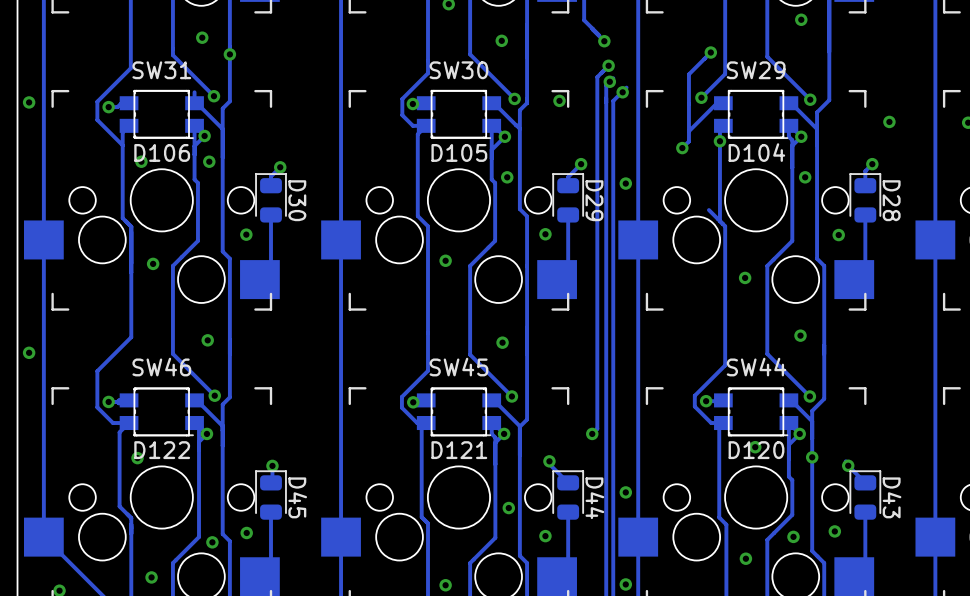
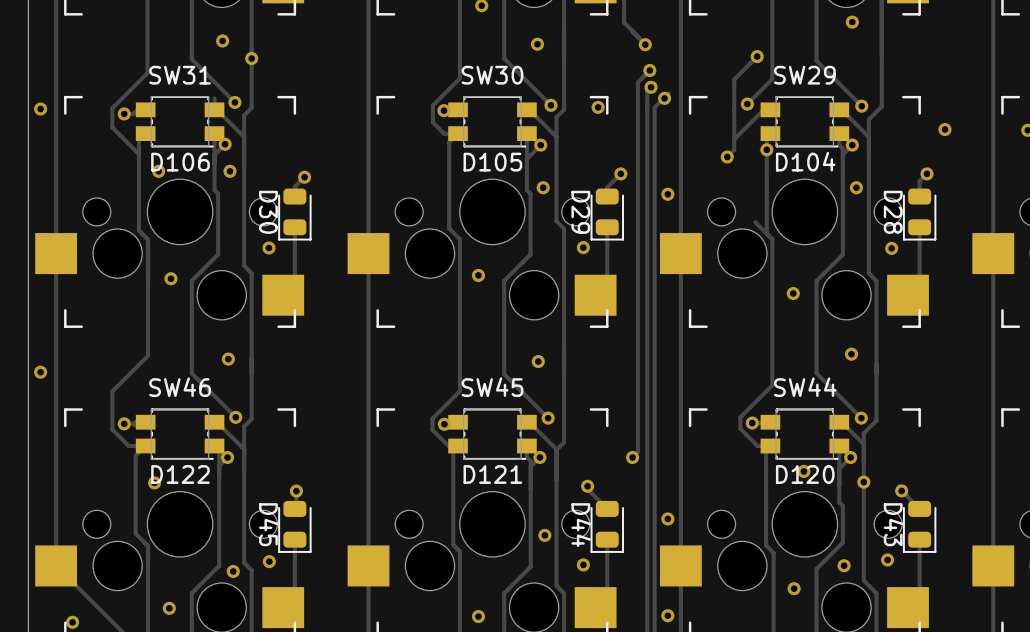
D30 rotation: 0° (271, 197) -> 180° (294, 214)
D29 rotation: 0° (568, 197) -> 180° (607, 214)
D28 rotation: 0° (865, 197) -> 180° (919, 214)
D45 rotation: 0° (271, 495) -> 180° (294, 526)
D44 rotation: 0° (568, 495) -> 180° (607, 526)
D43 rotation: 0° (865, 495) -> 180° (919, 526)

